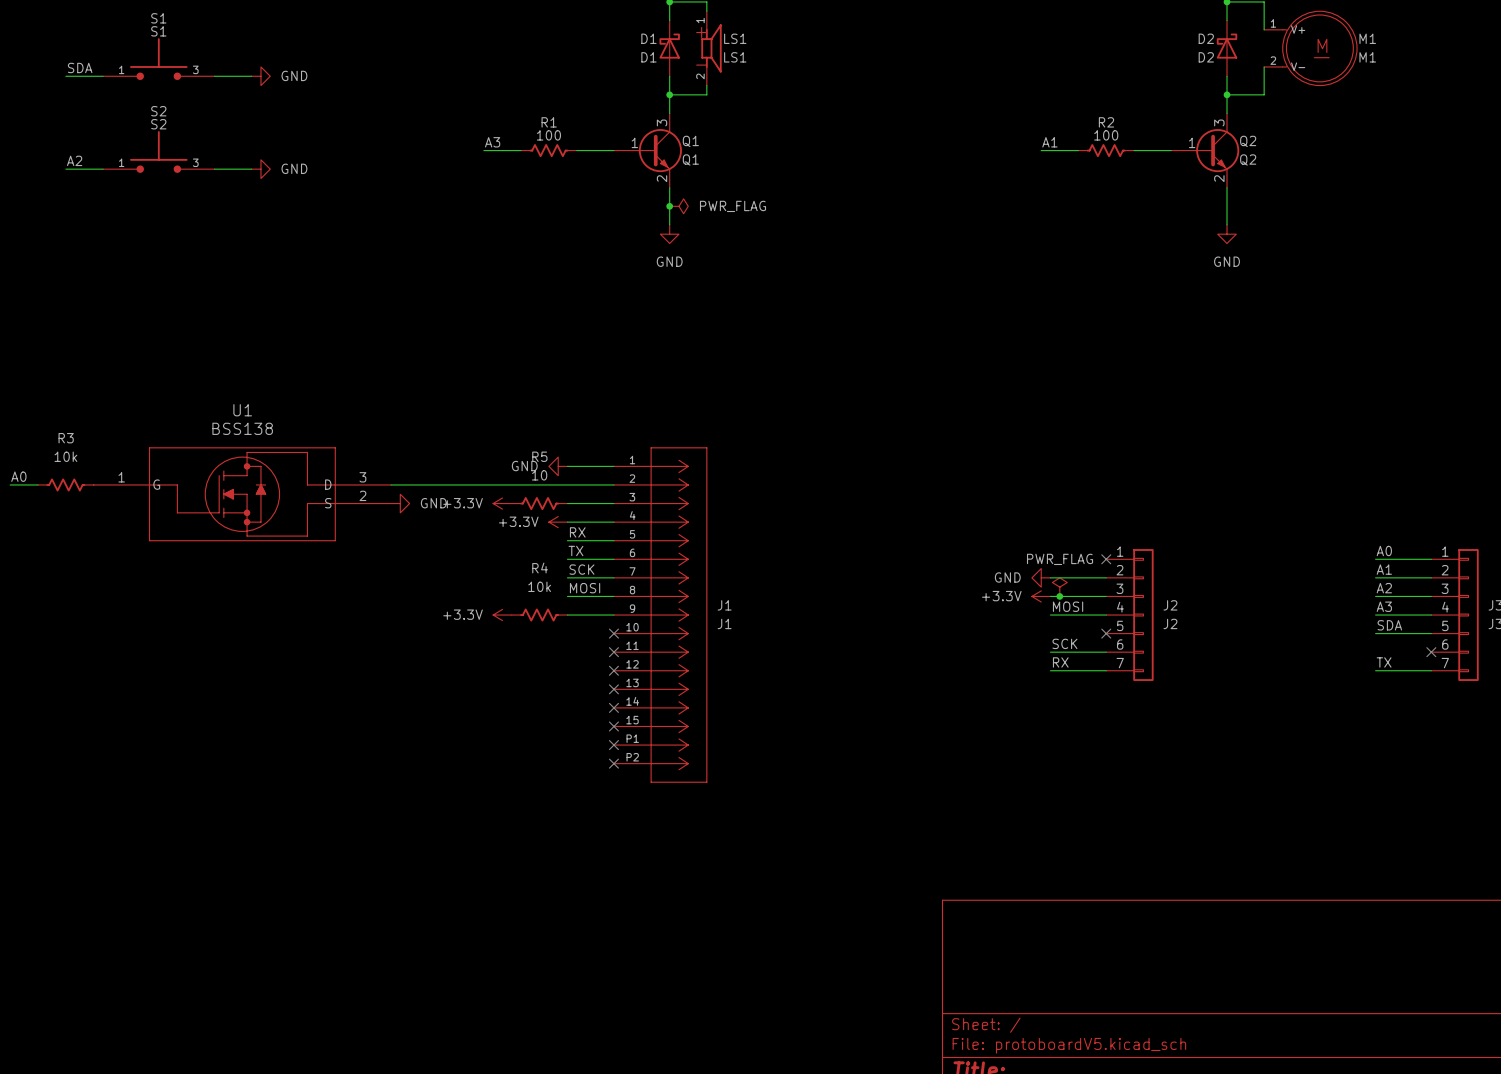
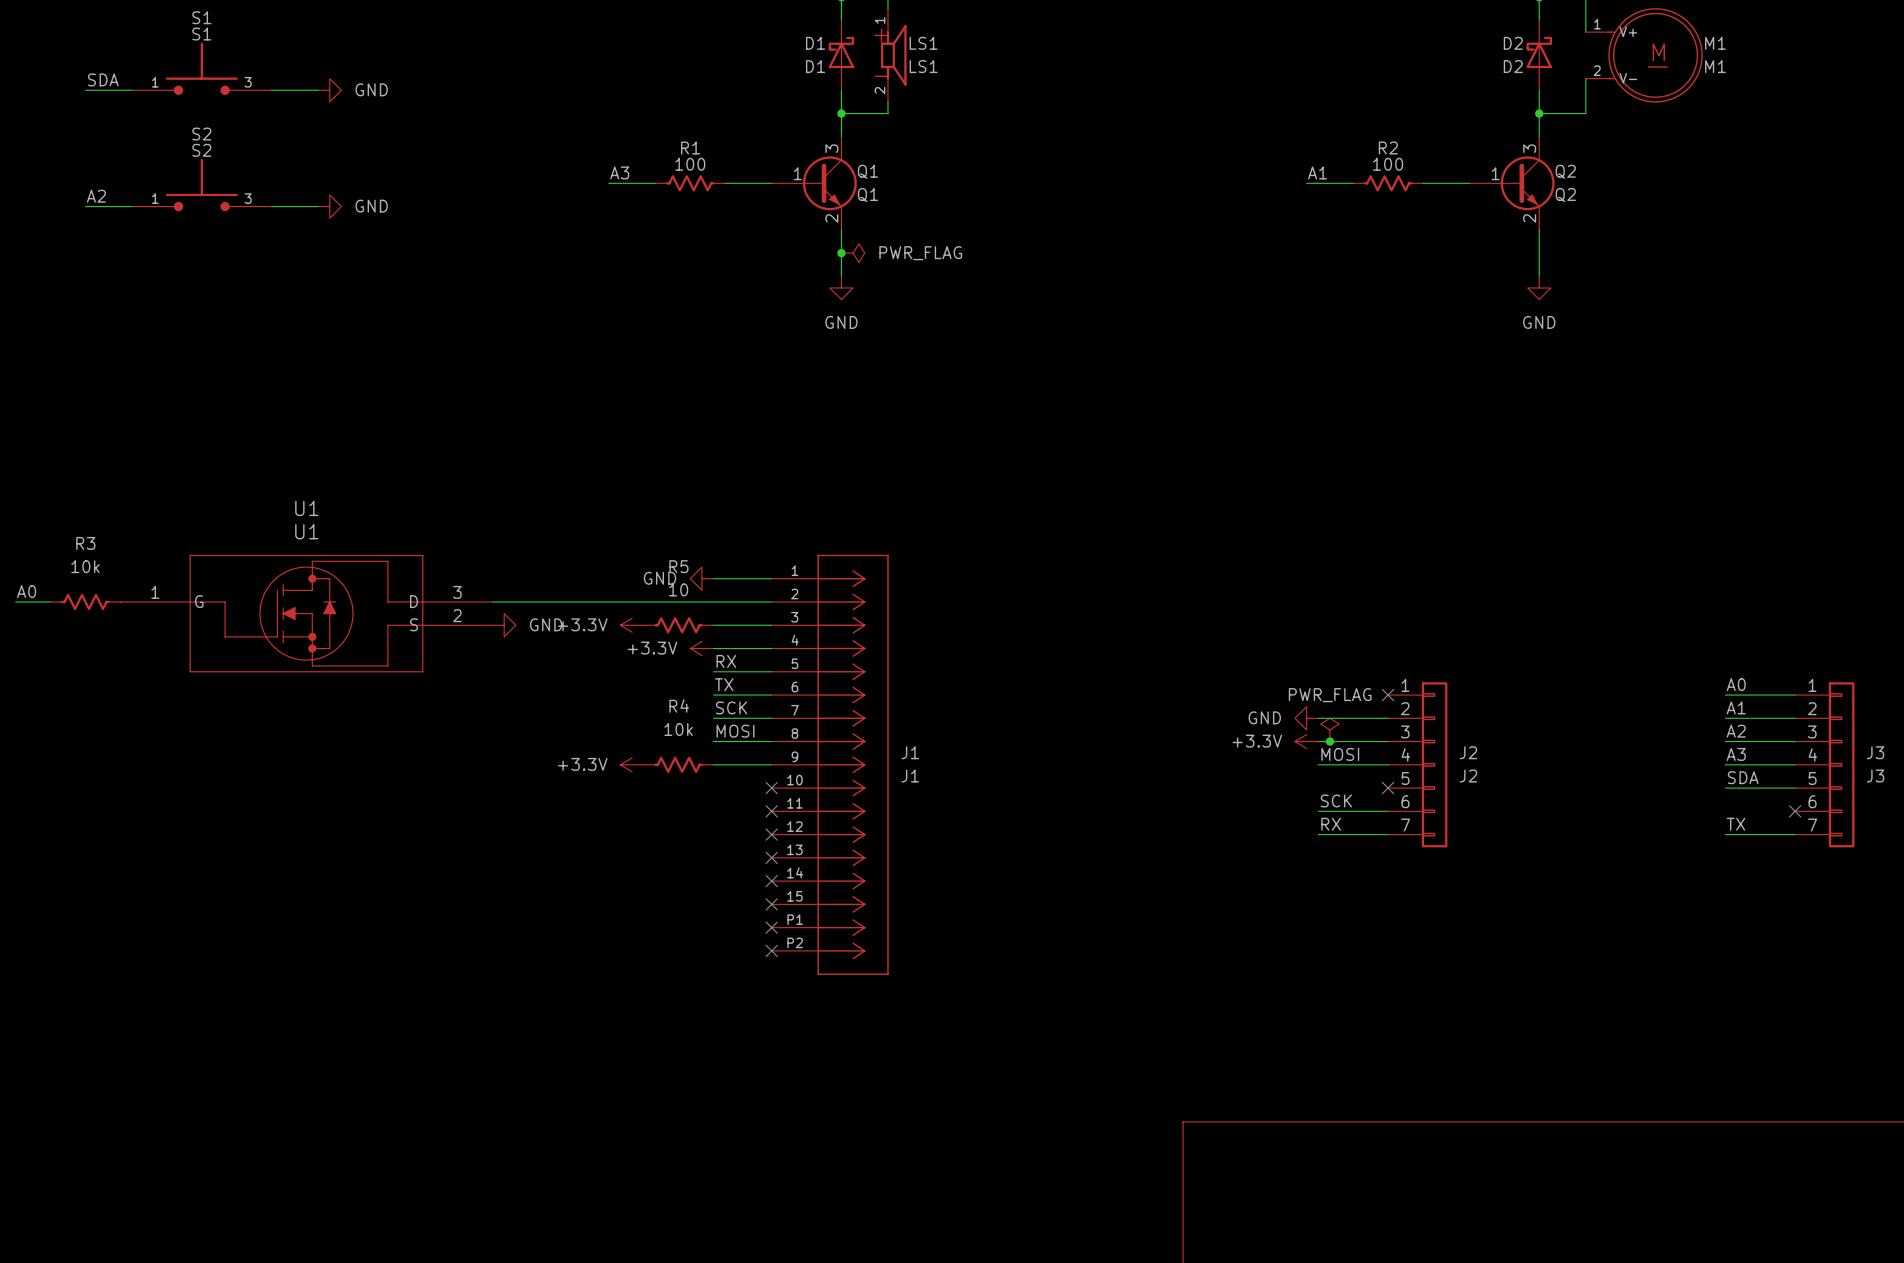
U1 value: BSS138 (242, 428) -> U1 (306, 531)

